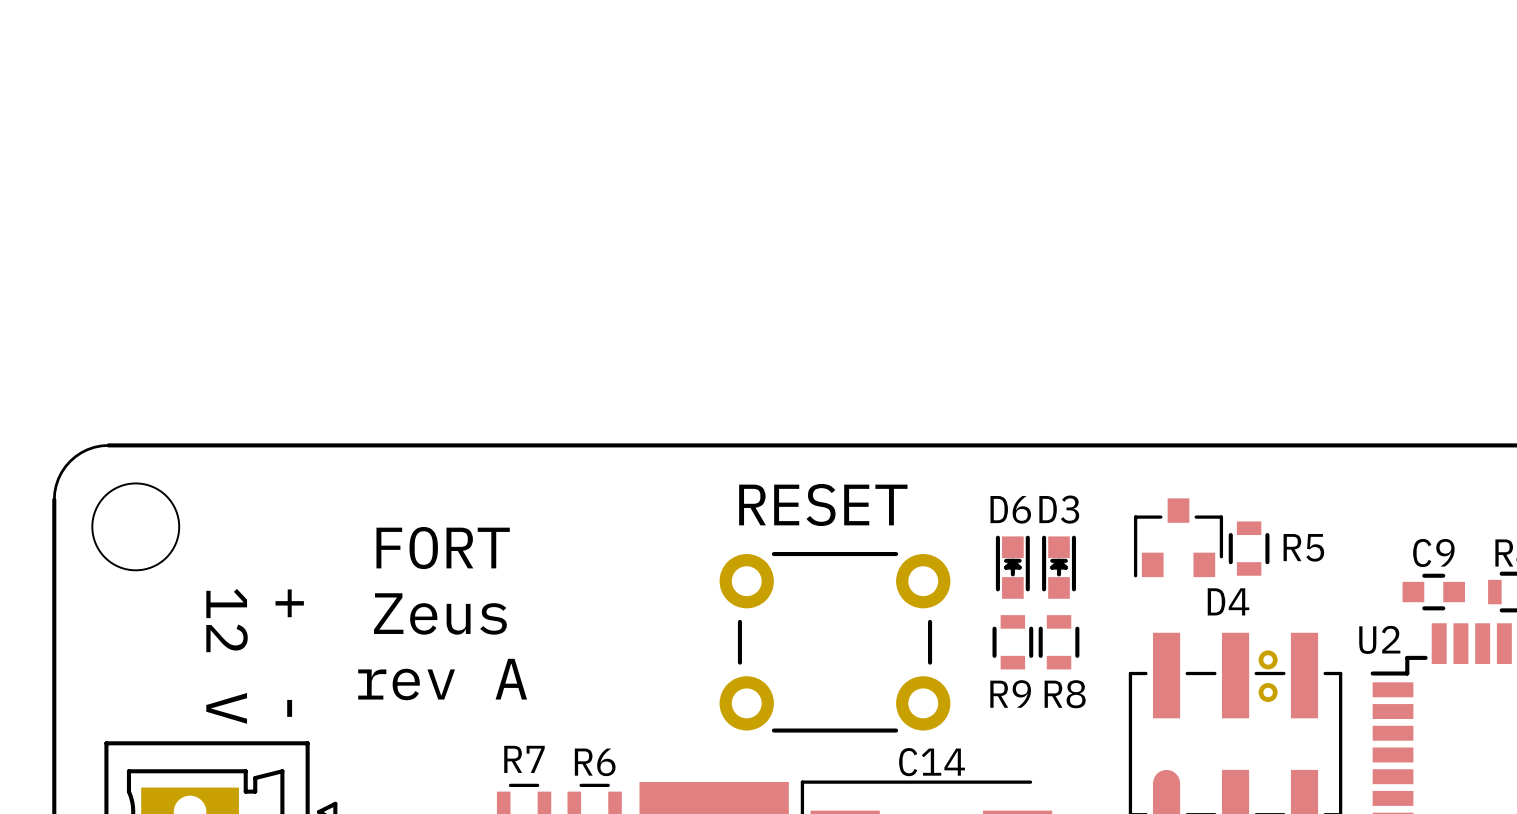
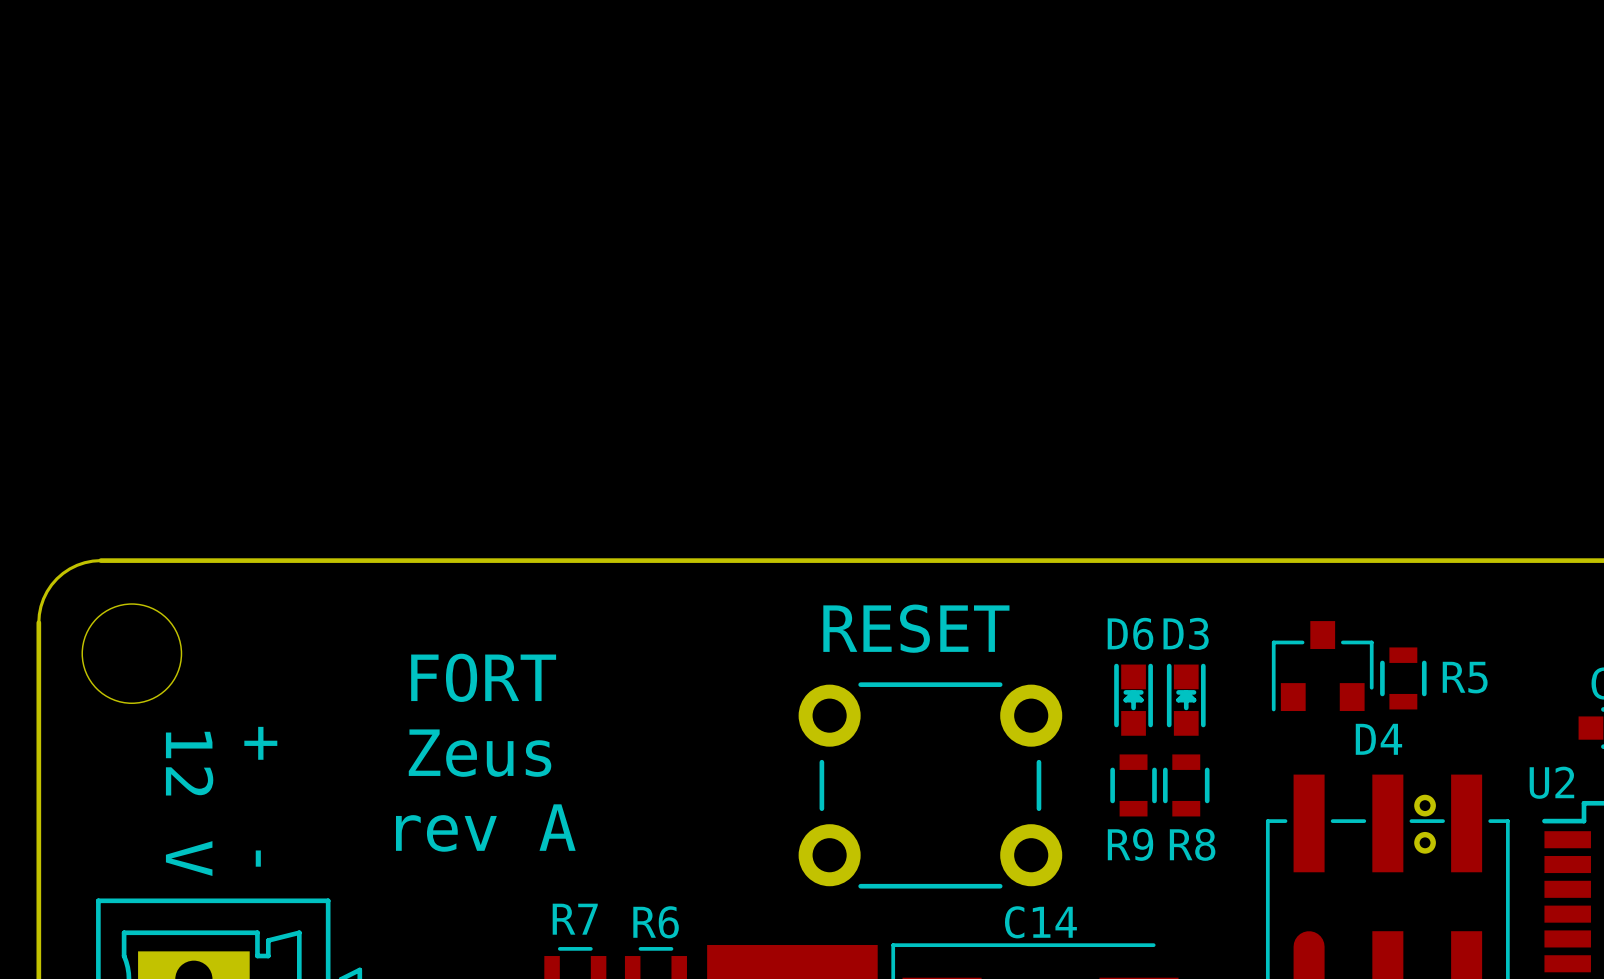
text position: + - (289, 653) -> + - (260, 796)
text position: 12 V (227, 656) -> 12 V (189, 803)

